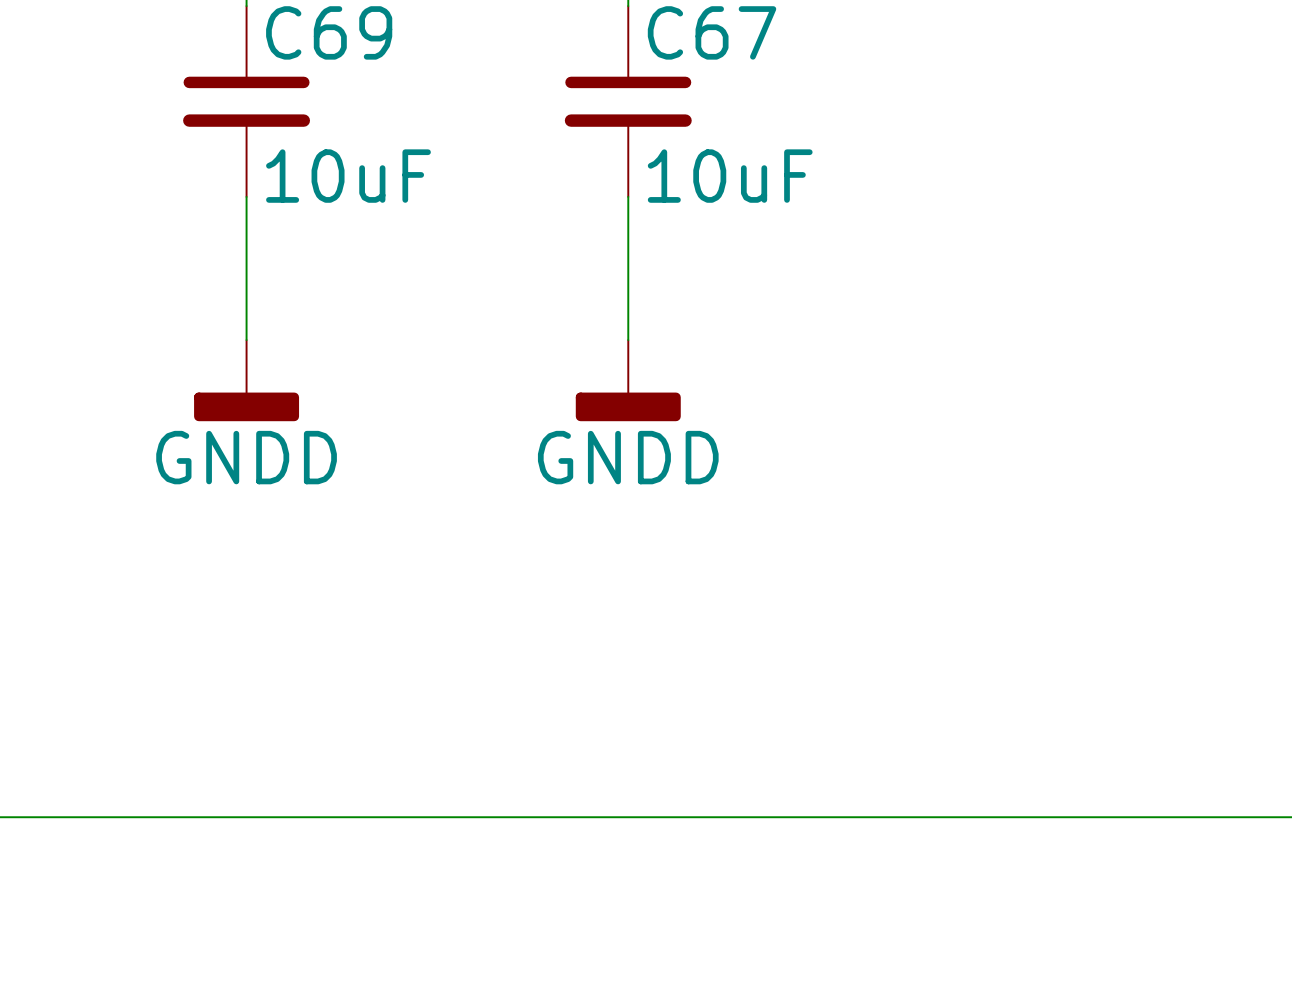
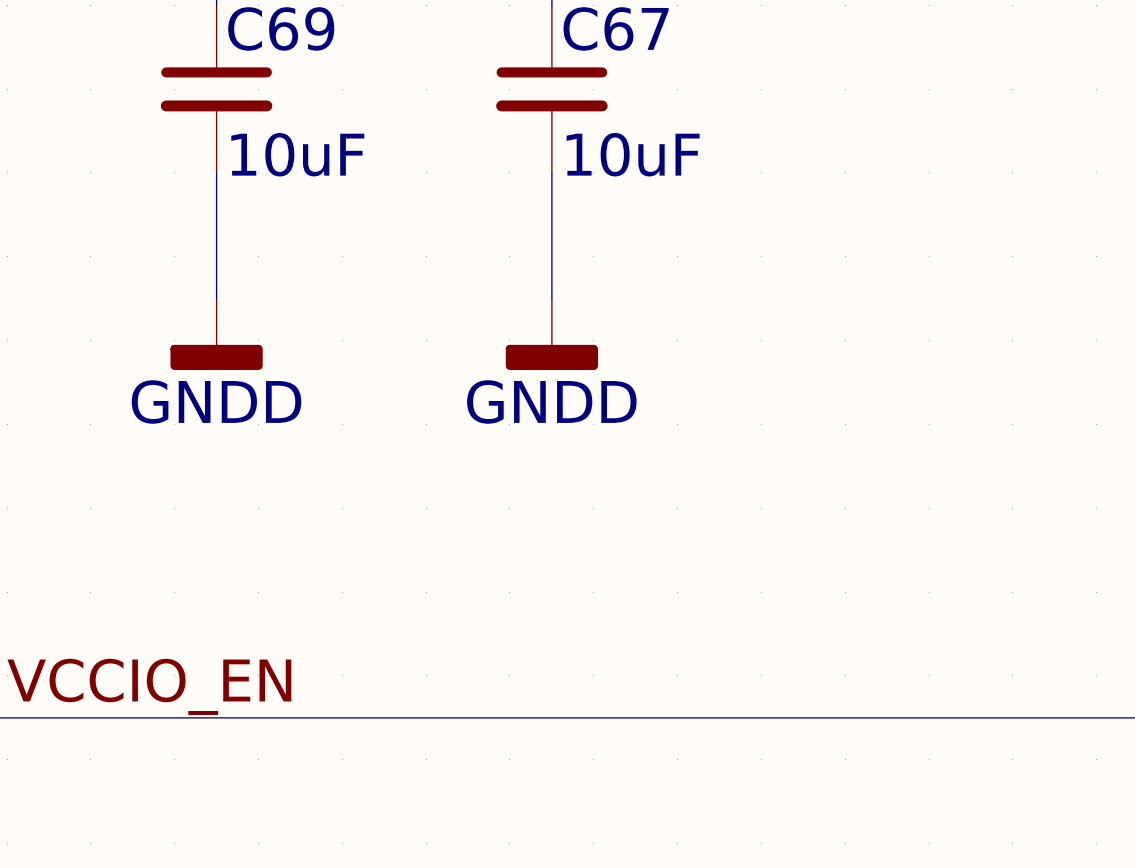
label: none -> VCCIO_EN (149, 686)

